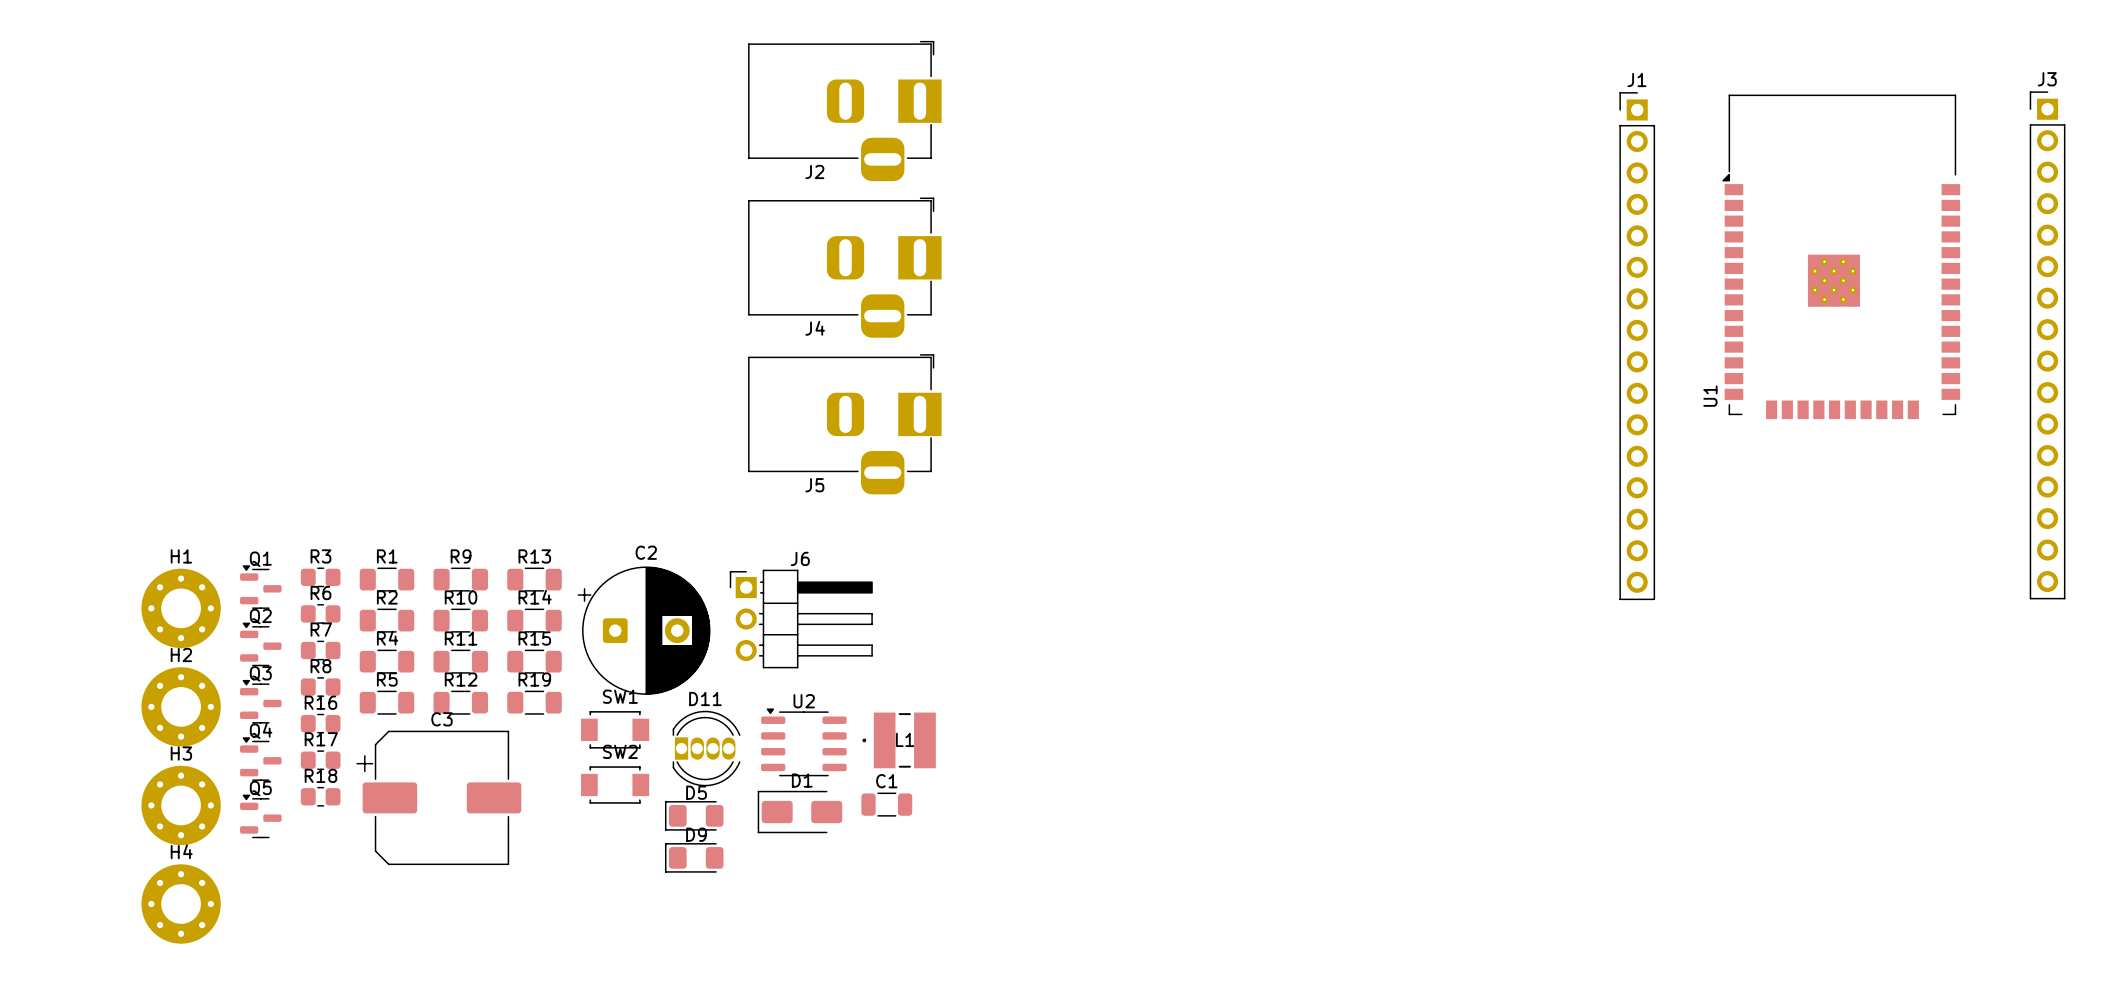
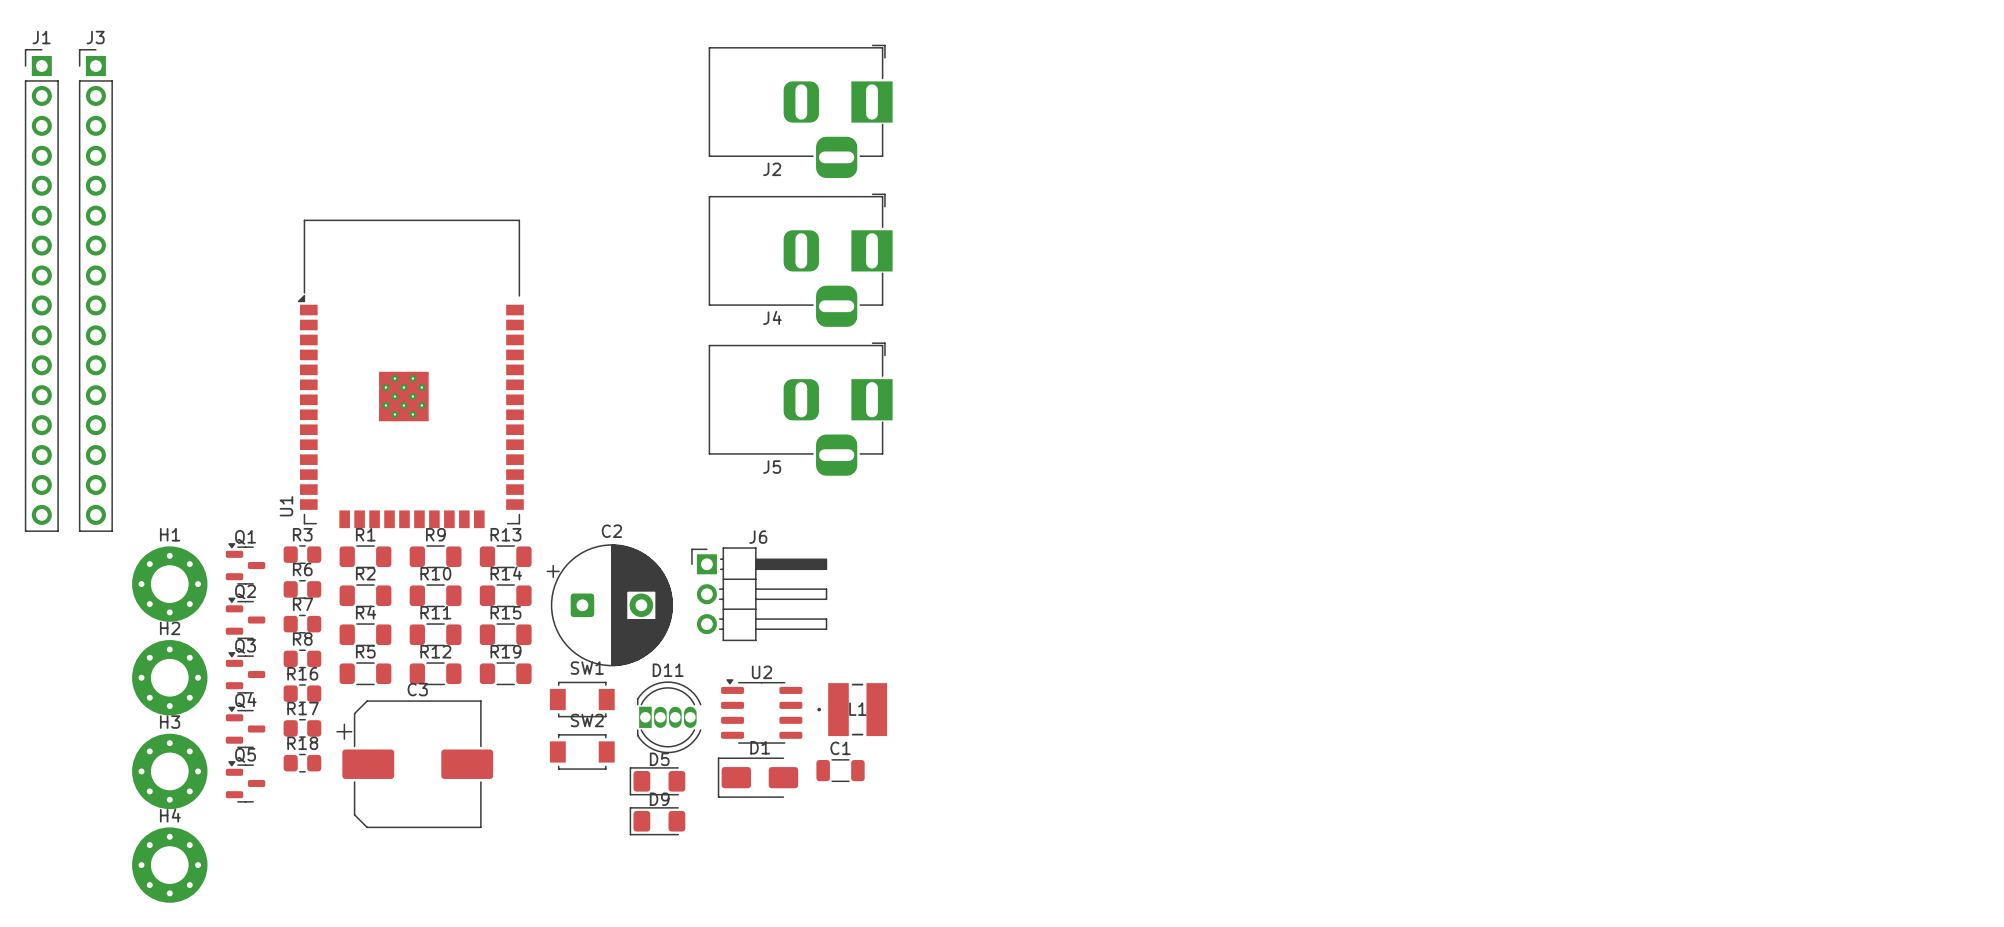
U1 position: (1841, 256) -> (410, 373)
J3 position: (2047, 345) -> (95, 290)
J1 position: (1637, 346) -> (41, 290)

